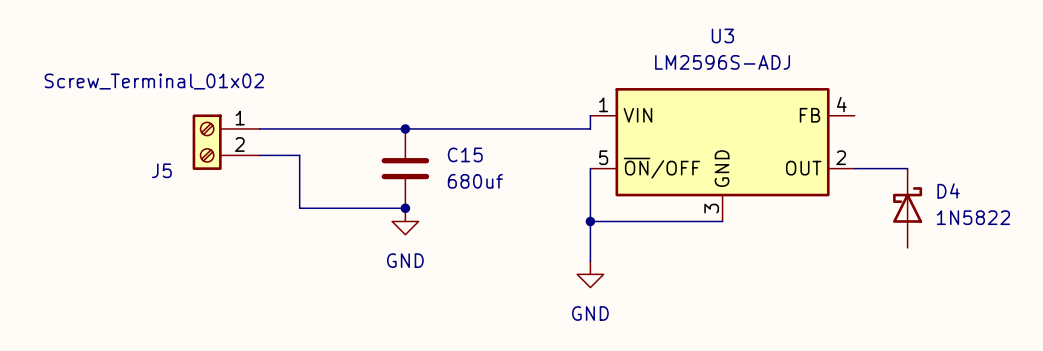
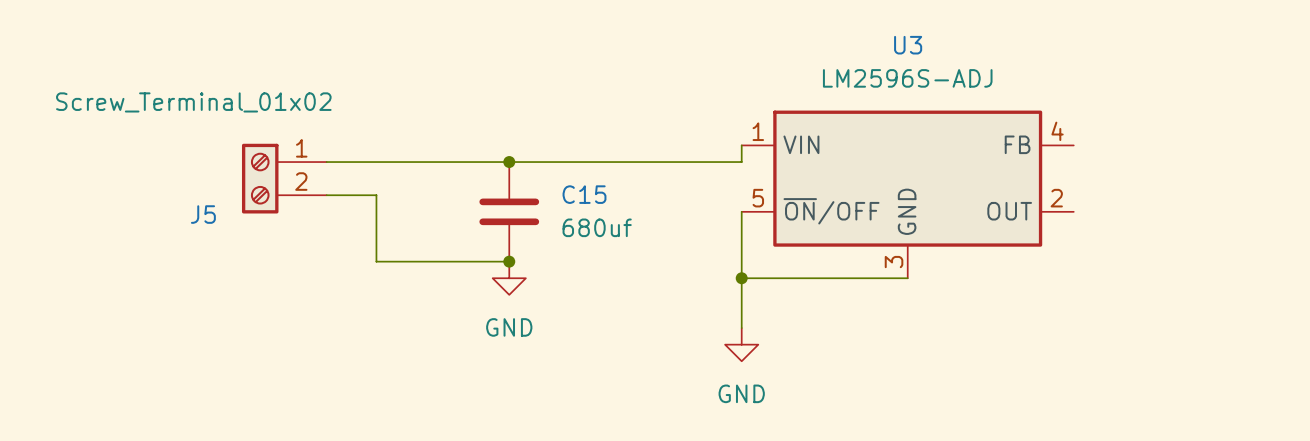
wire: (854, 168) (907, 168) -> none
D4: 1N5822 (907, 208) -> none

